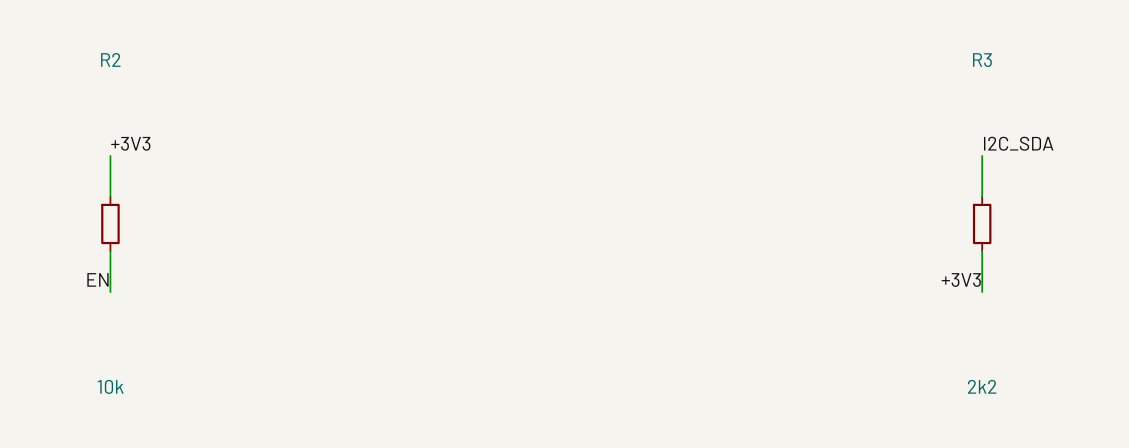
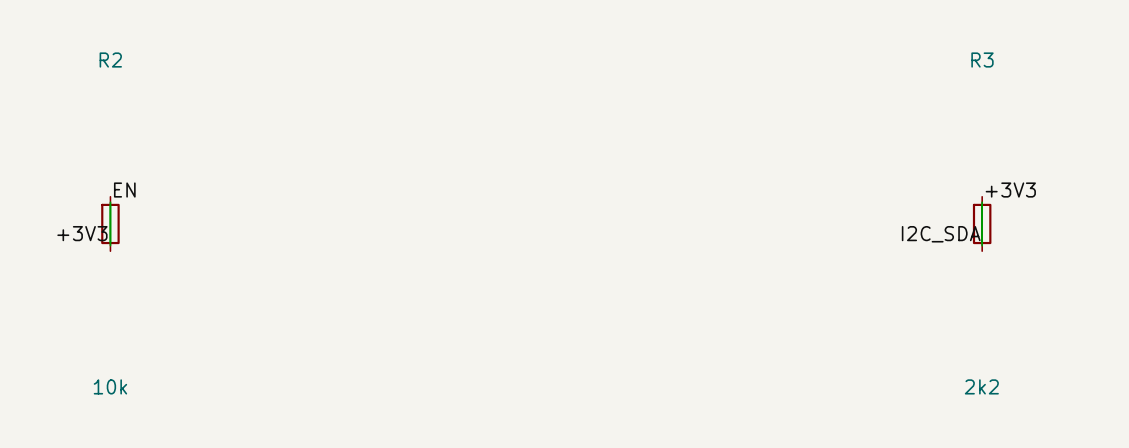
label position: +3V3 (130, 143) -> +3V3 (82, 233)
label position: I2C_SDA (1018, 143) -> I2C_SDA (941, 234)
wire: (110, 155) (110, 196) -> none
wire: (982, 155) (982, 196) -> none
wire: none -> (110, 202) (110, 245)
wire: none -> (982, 202) (982, 245)
wire: (110, 251) (110, 292) -> none
wire: (982, 251) (982, 292) -> none
label position: EN (97, 279) -> EN (124, 190)
label position: +3V3 (961, 279) -> +3V3 (1010, 190)

